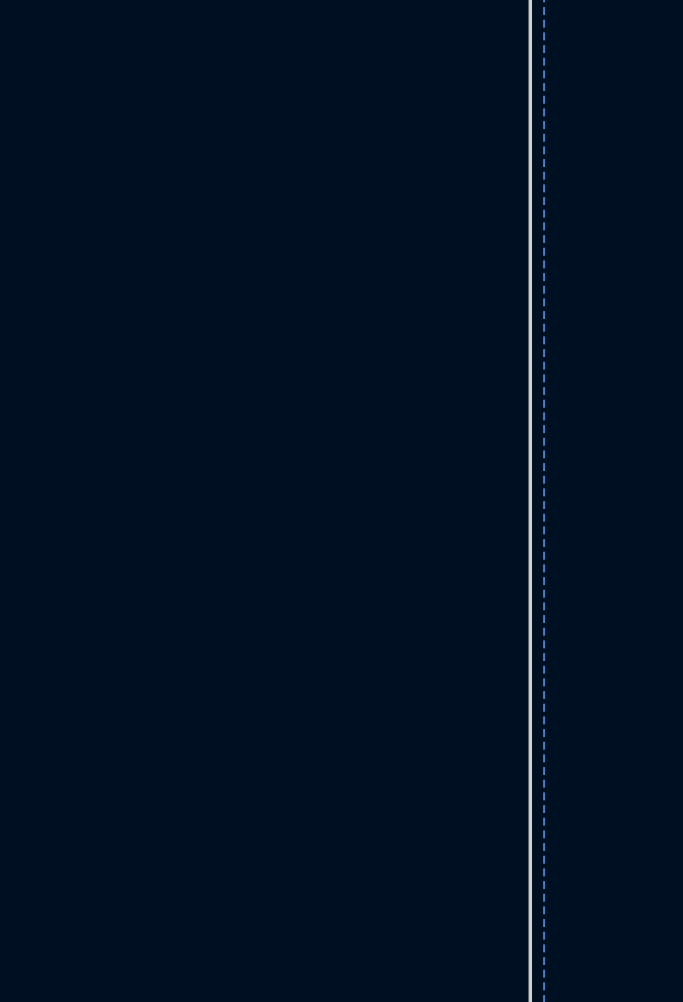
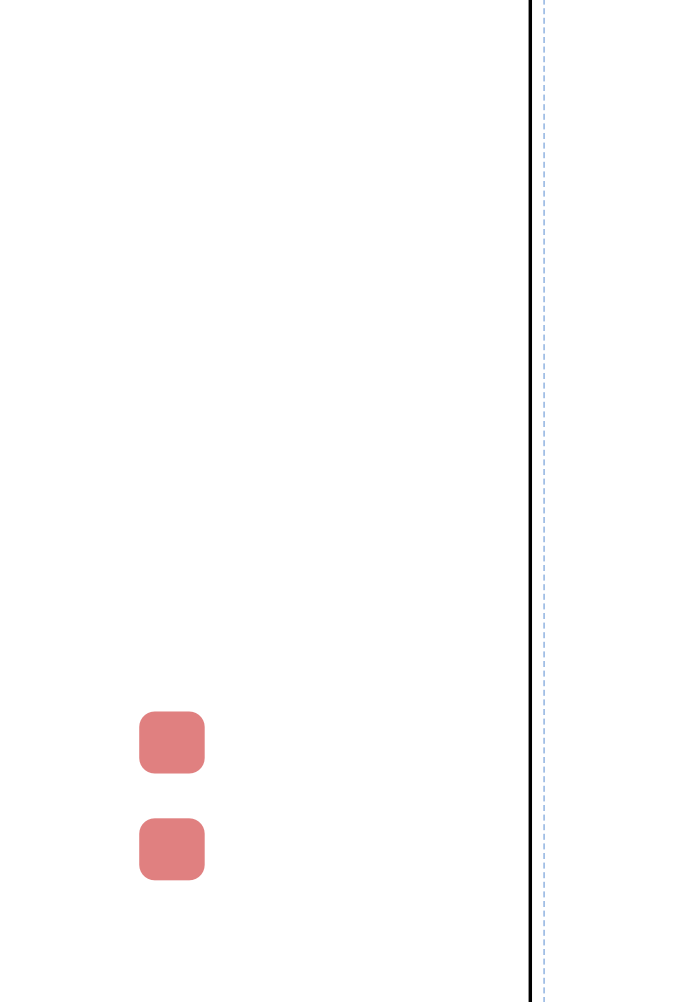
part: none -> (171, 795)

